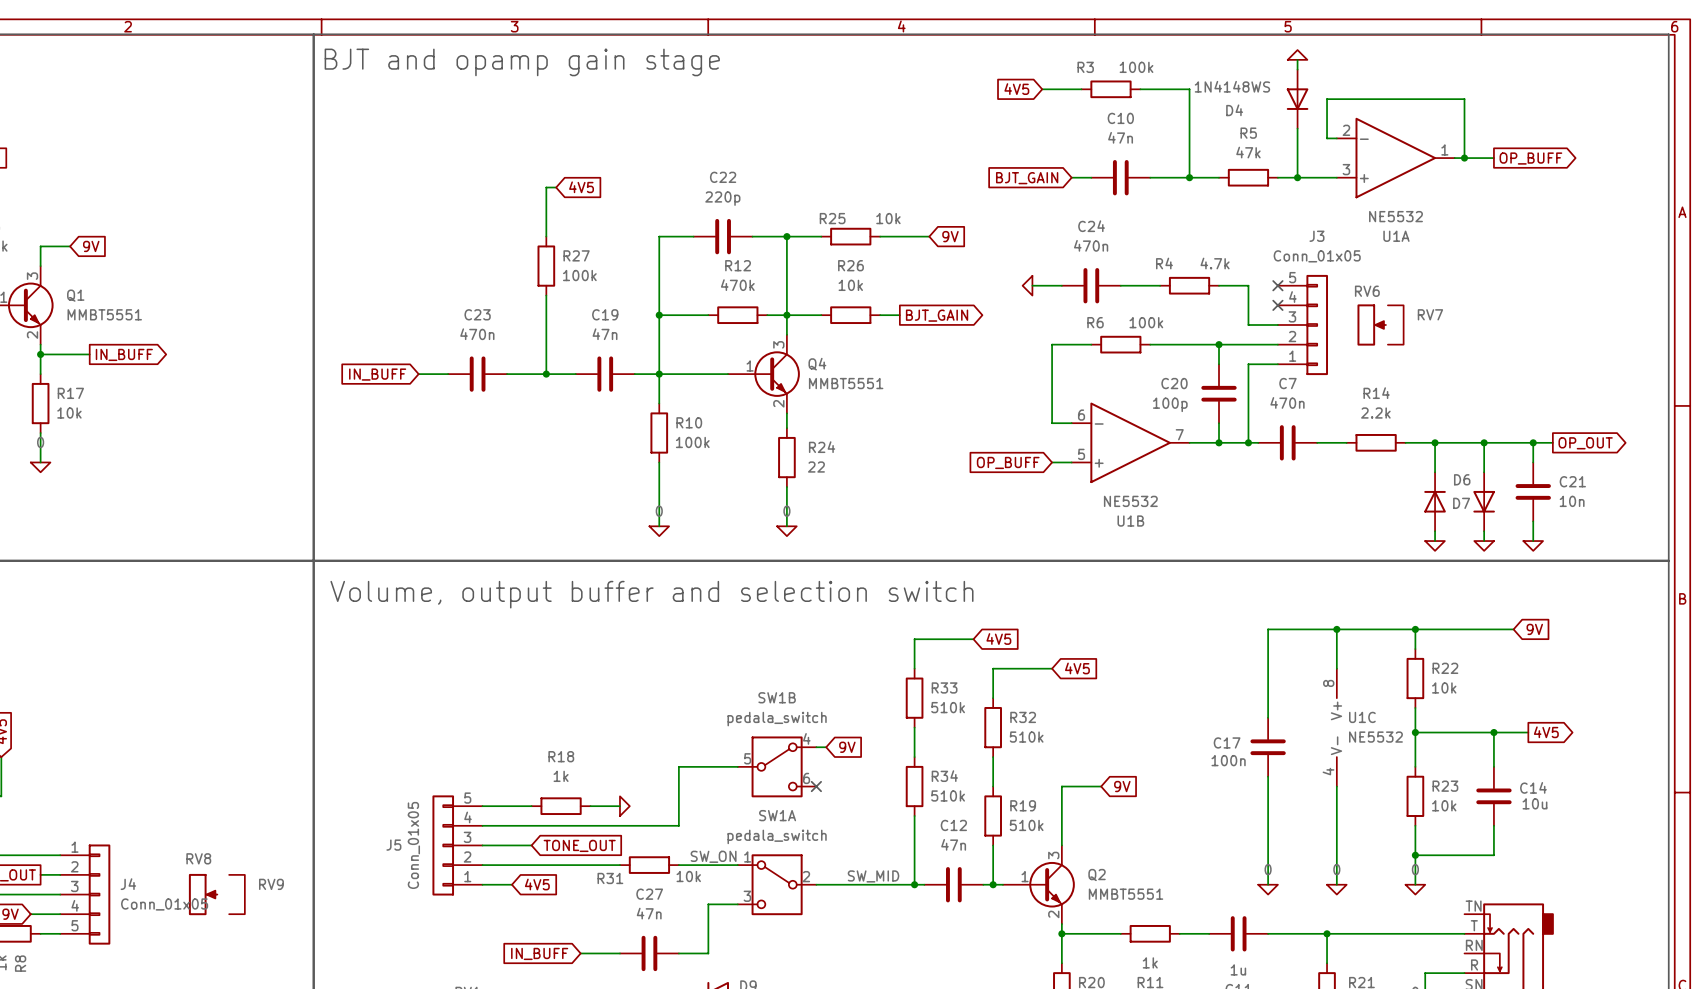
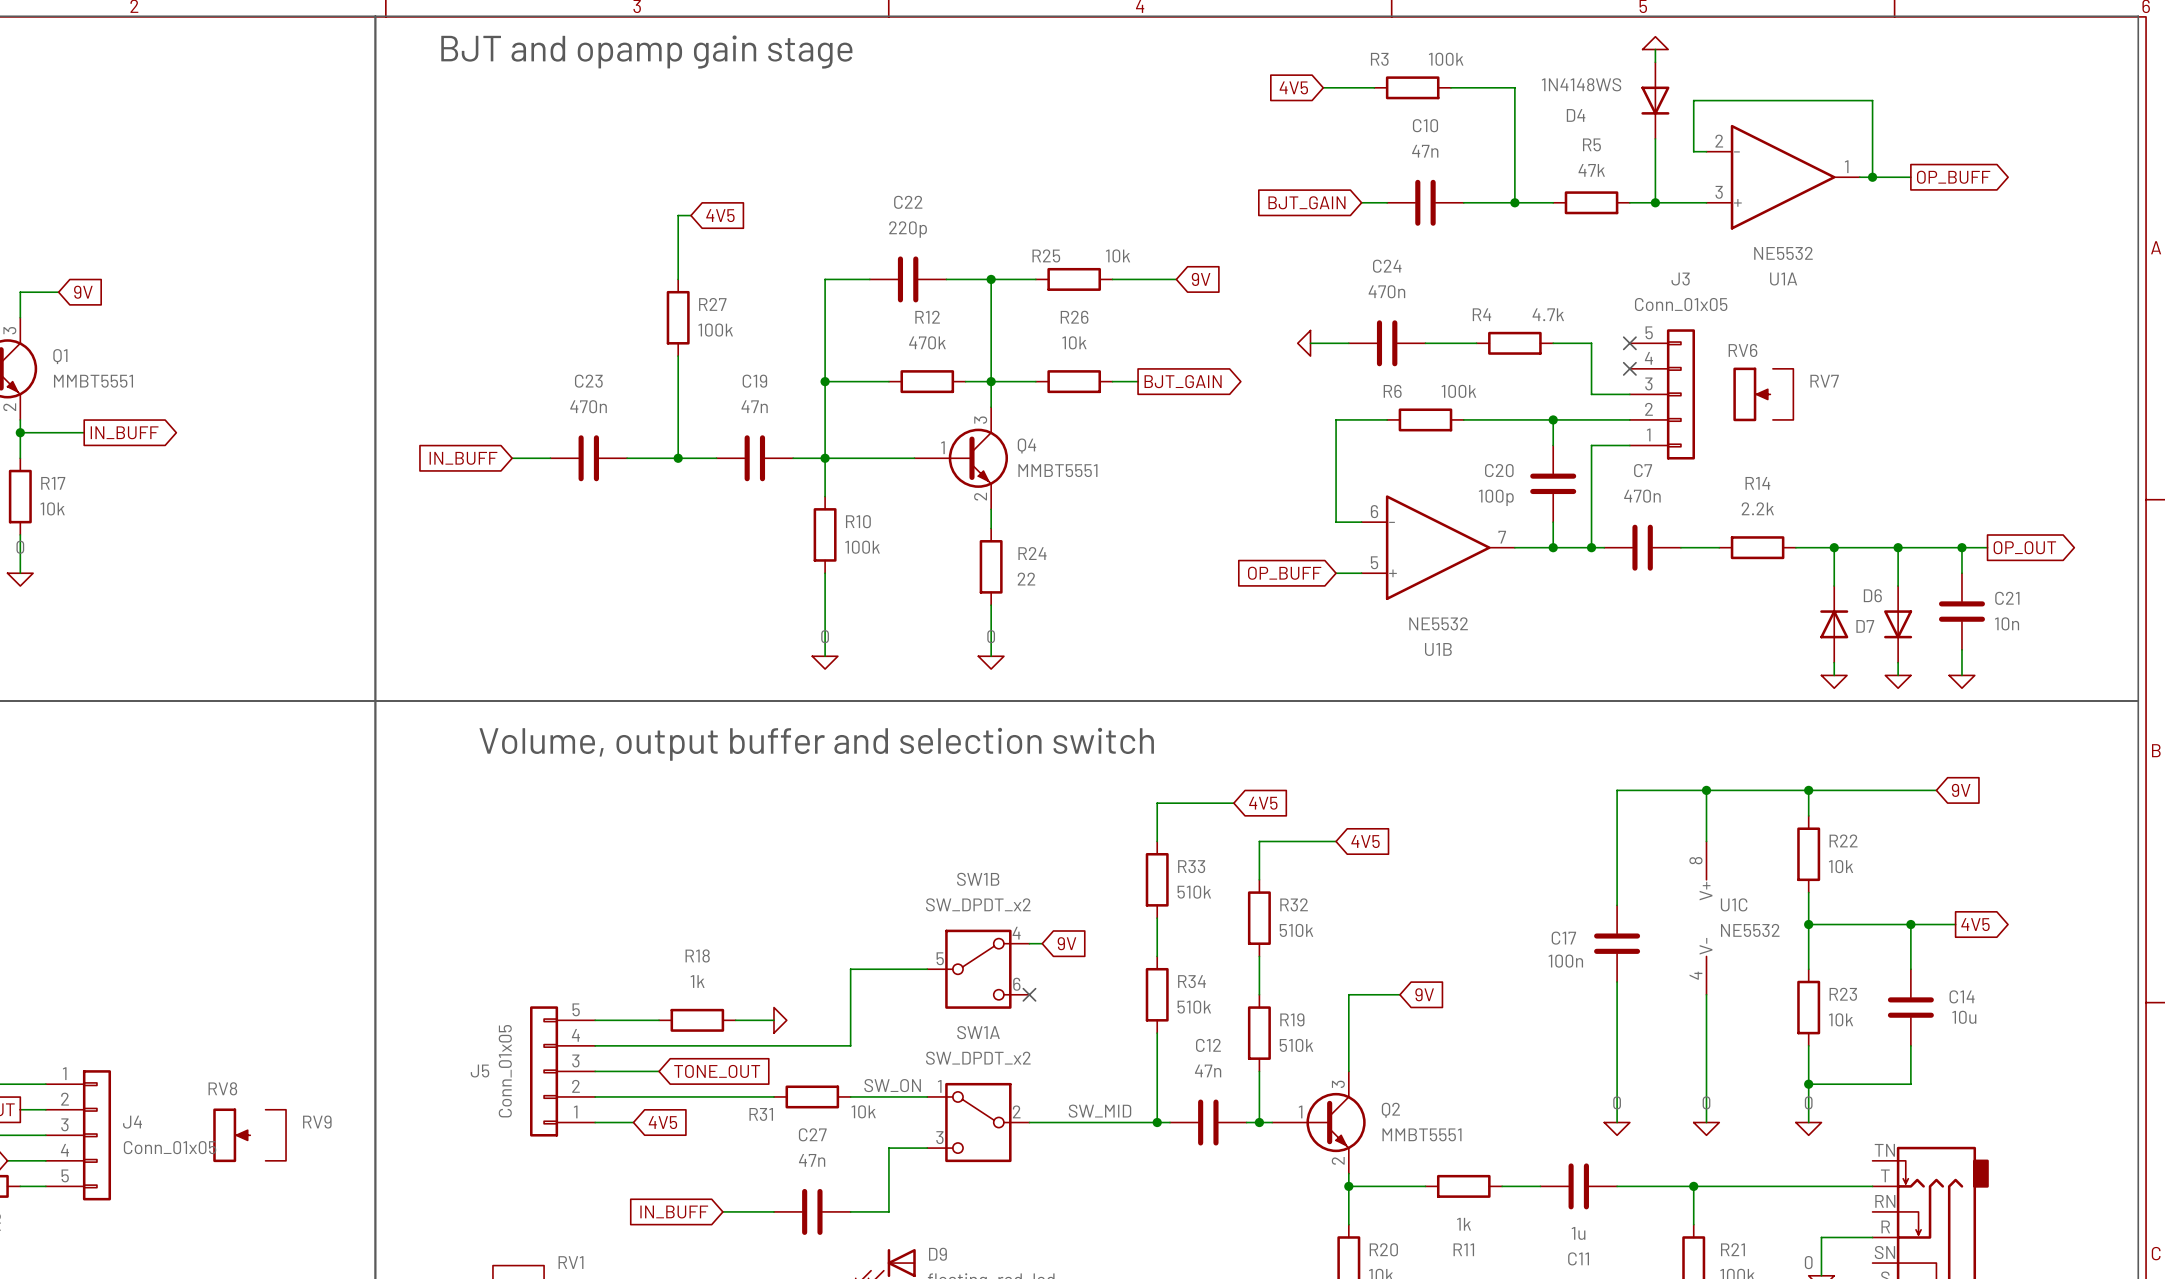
SW1B value: pedala_switch (777, 719) -> SW_DPDT_x2 (978, 904)
SW1A value: pedala_switch (777, 836) -> SW_DPDT_x2 (978, 1058)

